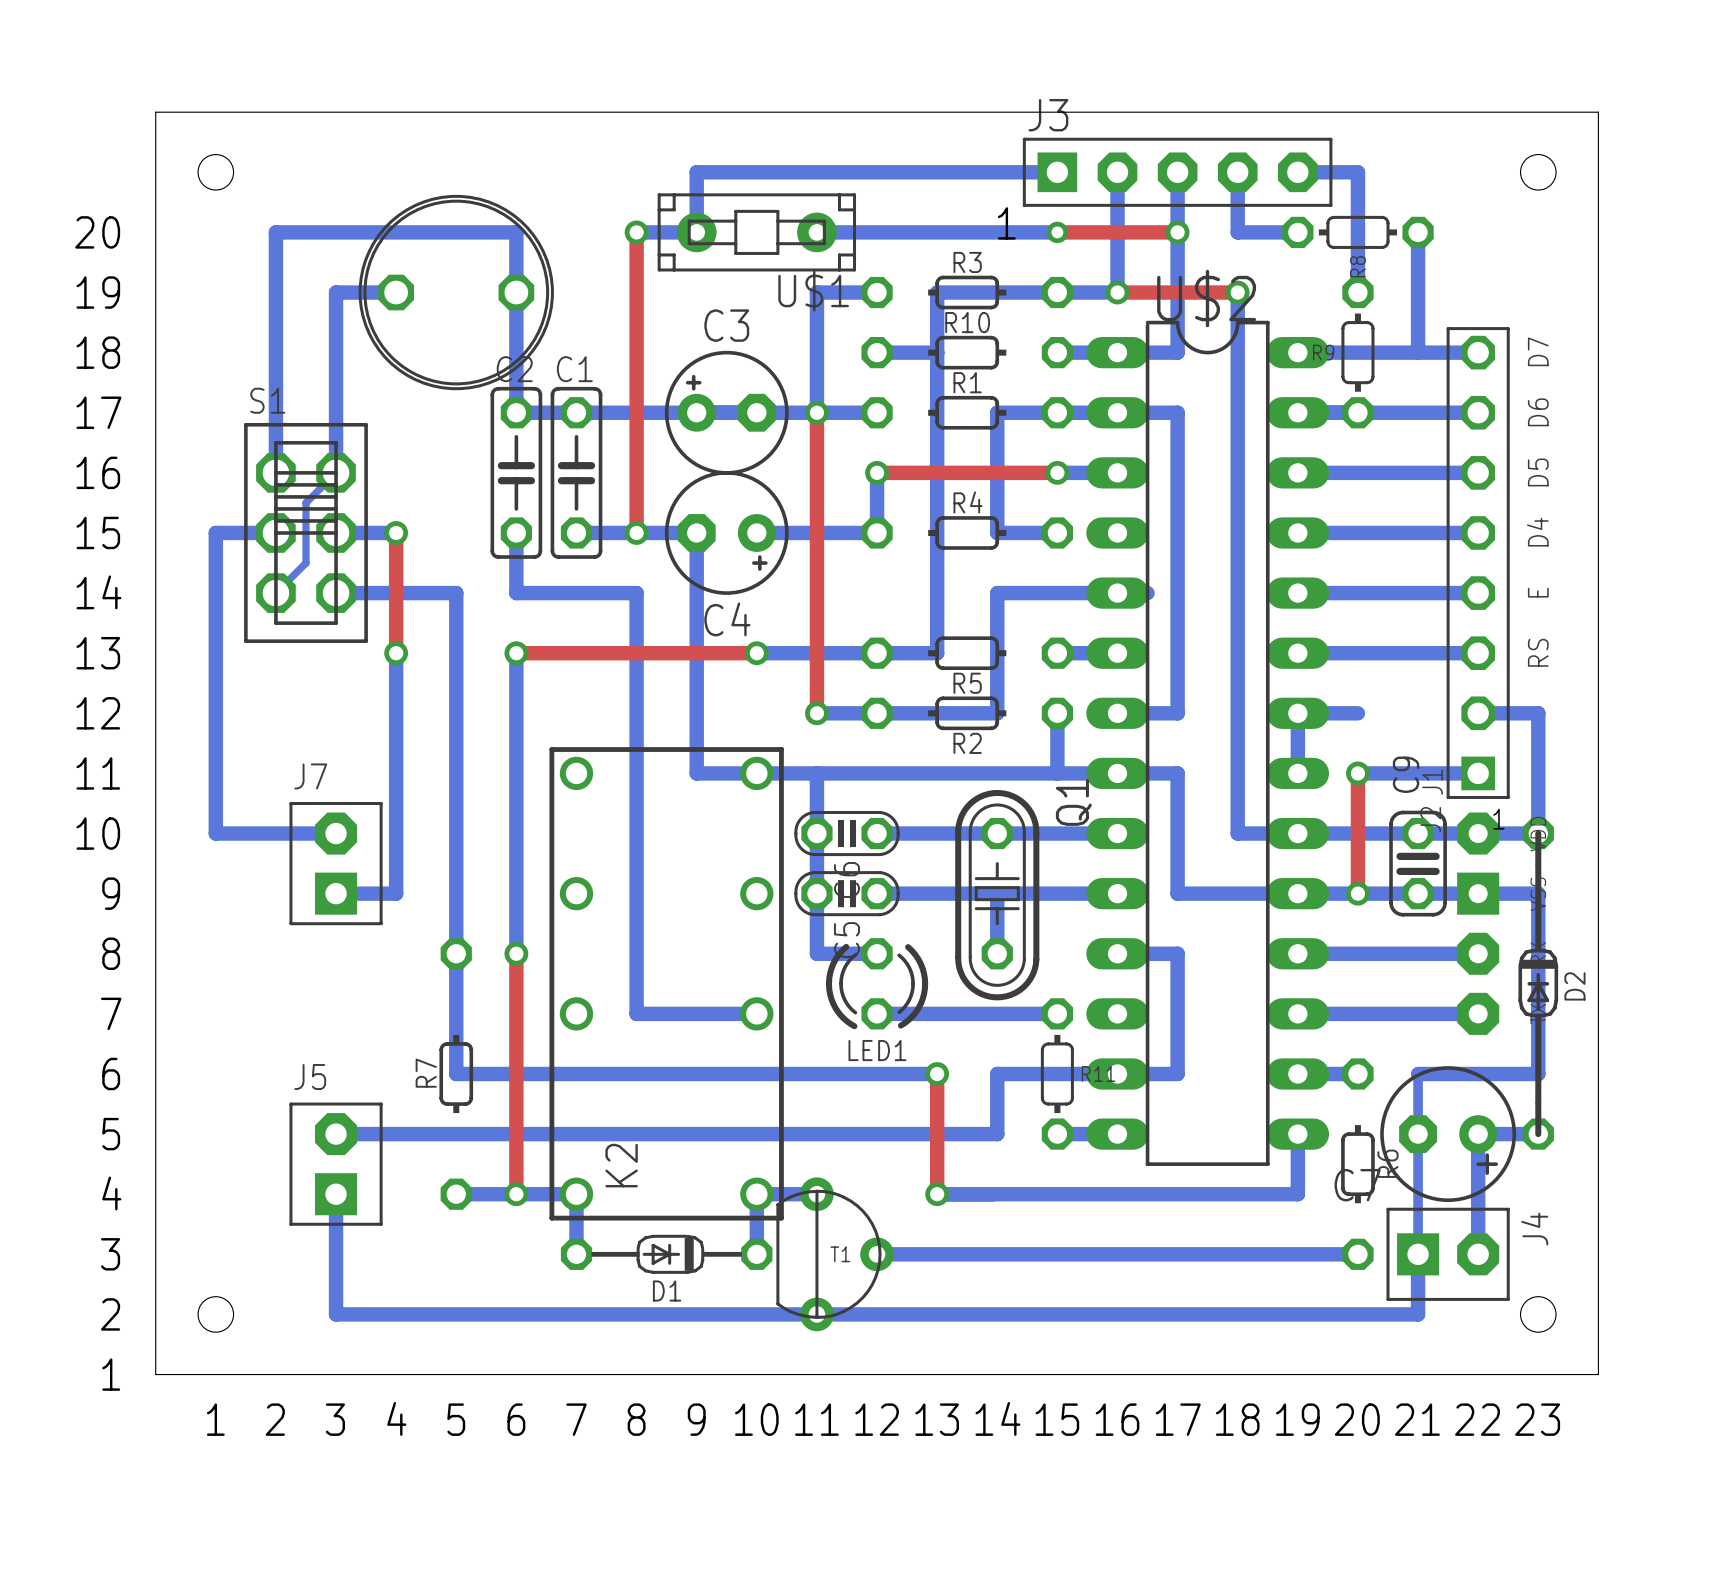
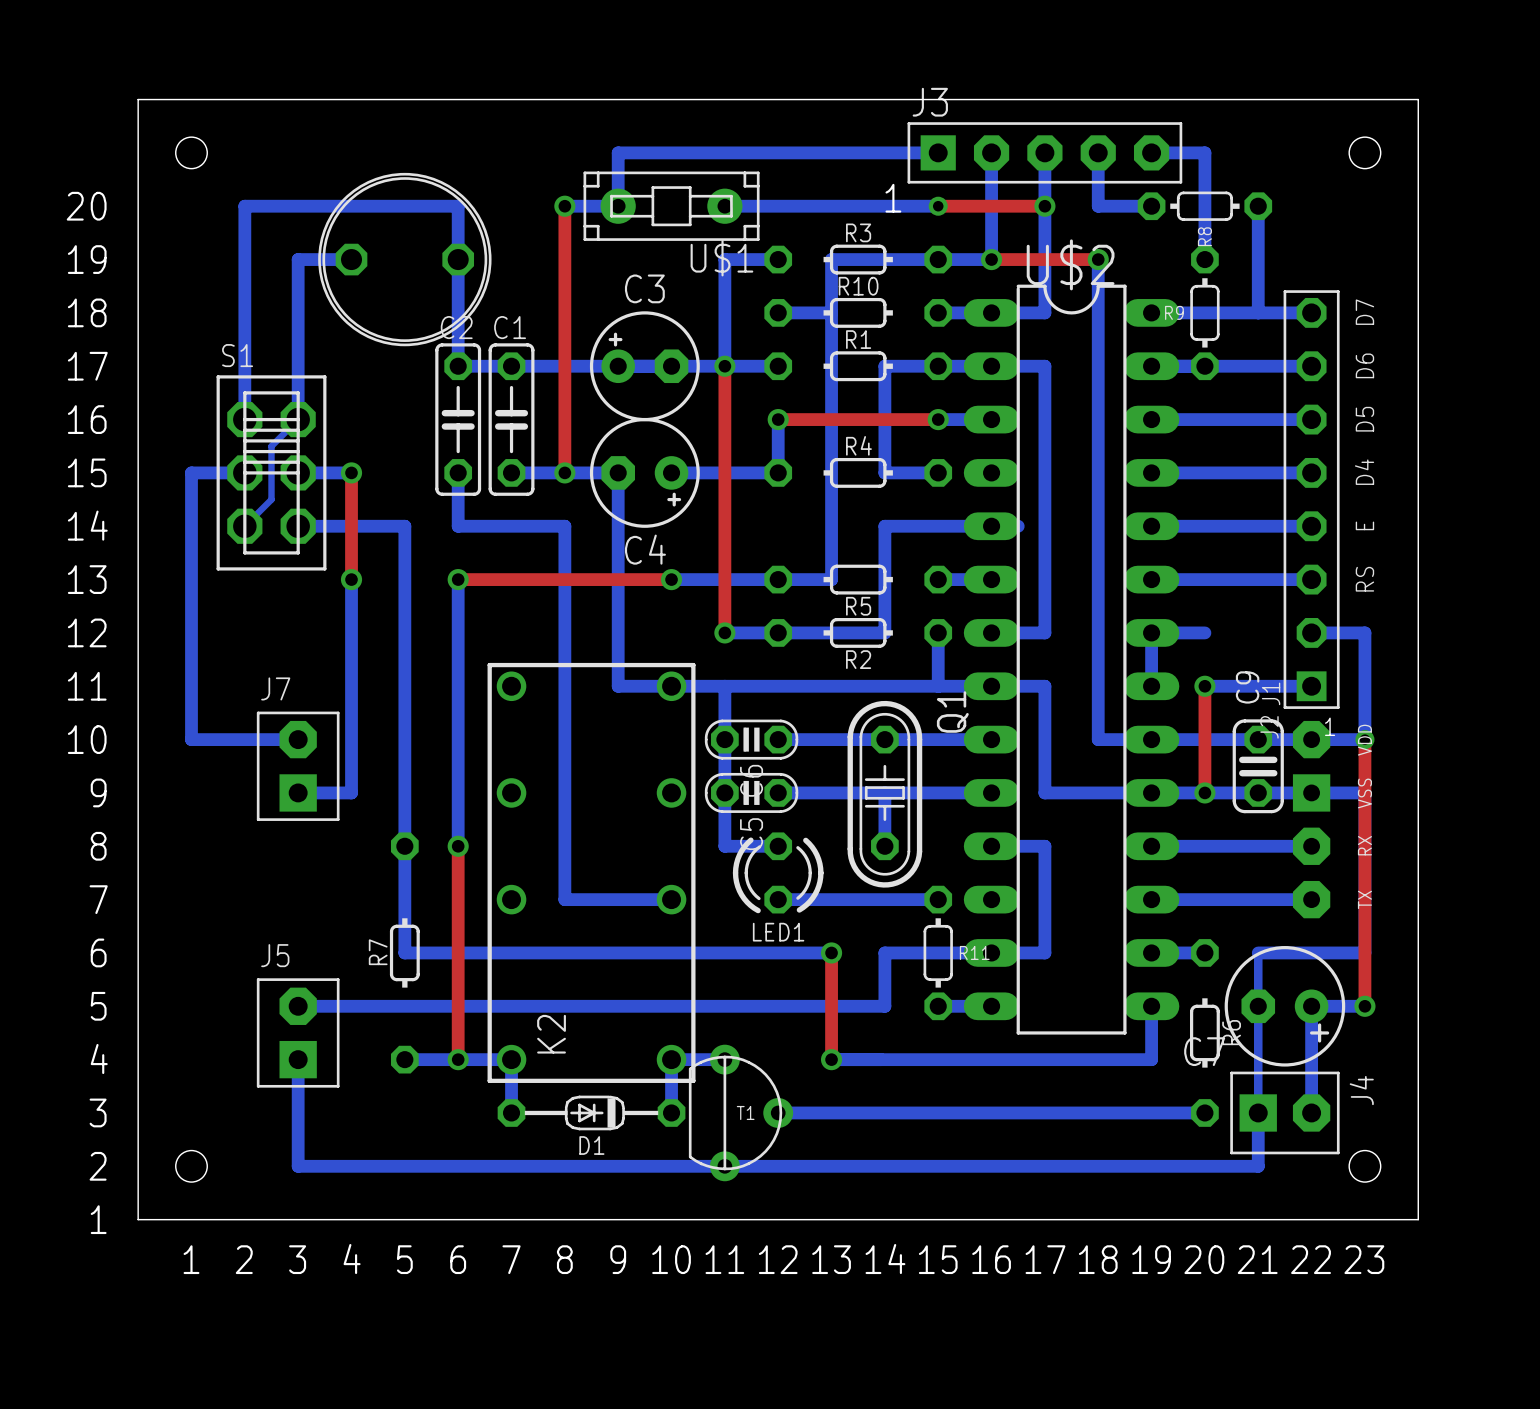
top track: none -> (1364, 739) (1364, 1006)
via: none -> (1364, 739)
D2: (1538, 983) -> none
via: none -> (1364, 1006)

